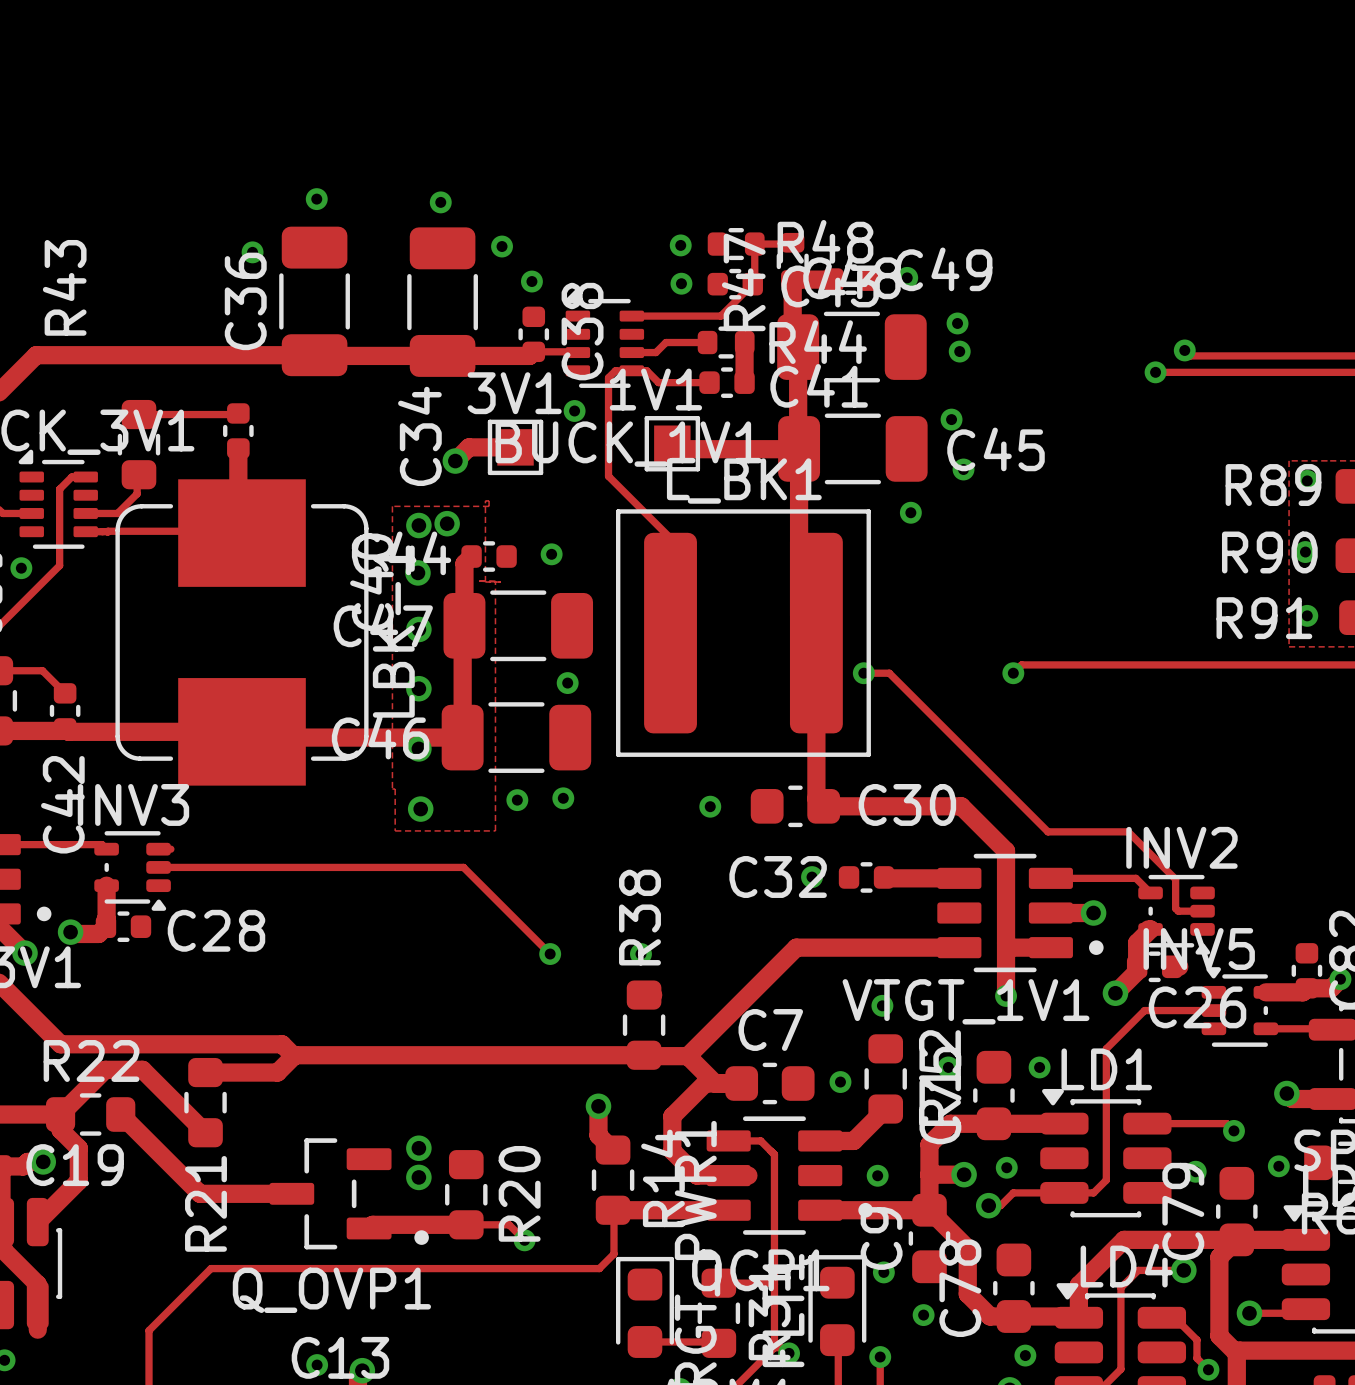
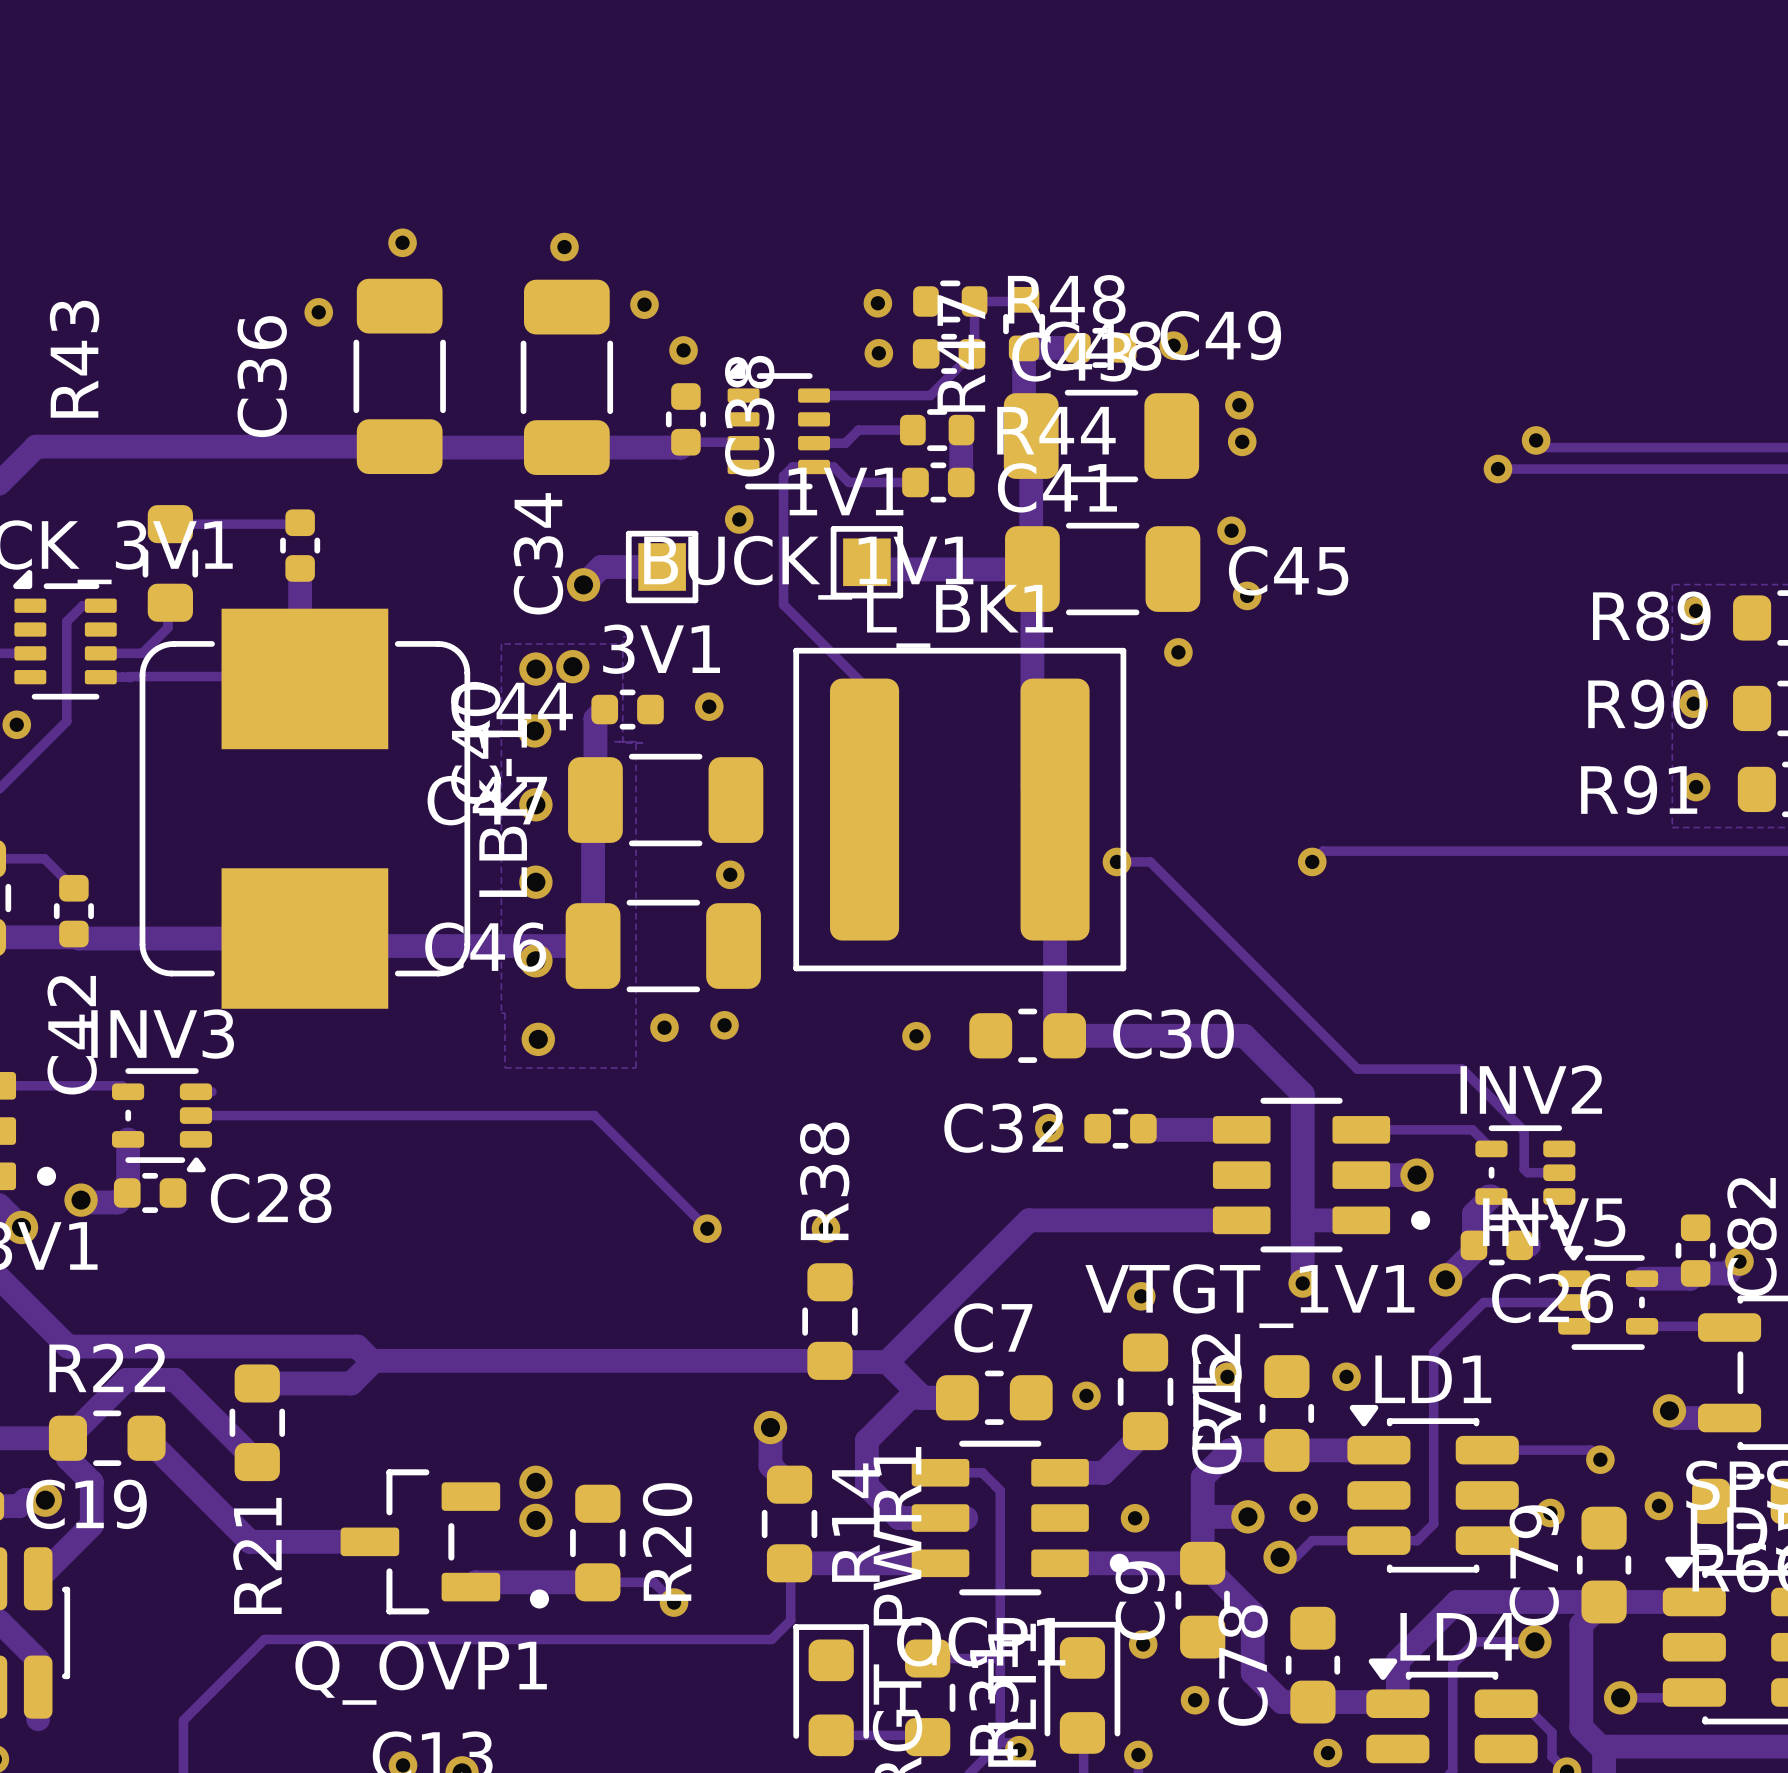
C36 name position: C36 (245, 301) -> C36 (262, 376)
3V1 name position: 3V1 (514, 393) -> 3V1 (661, 649)

